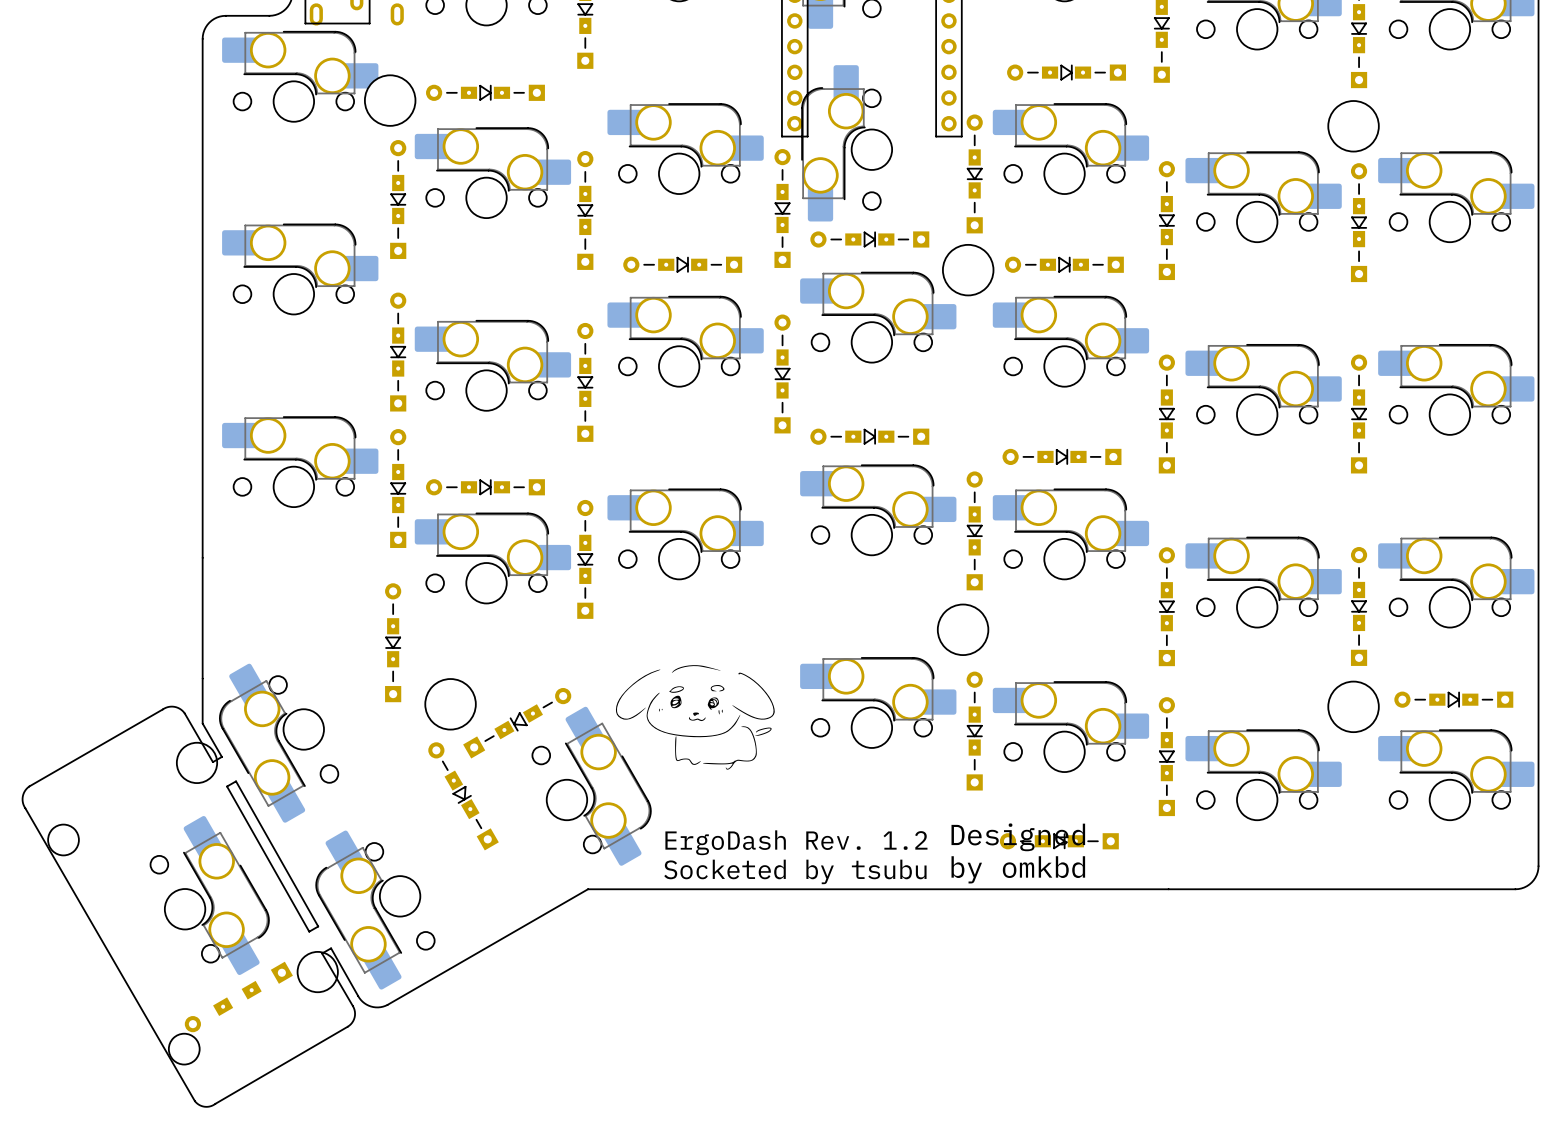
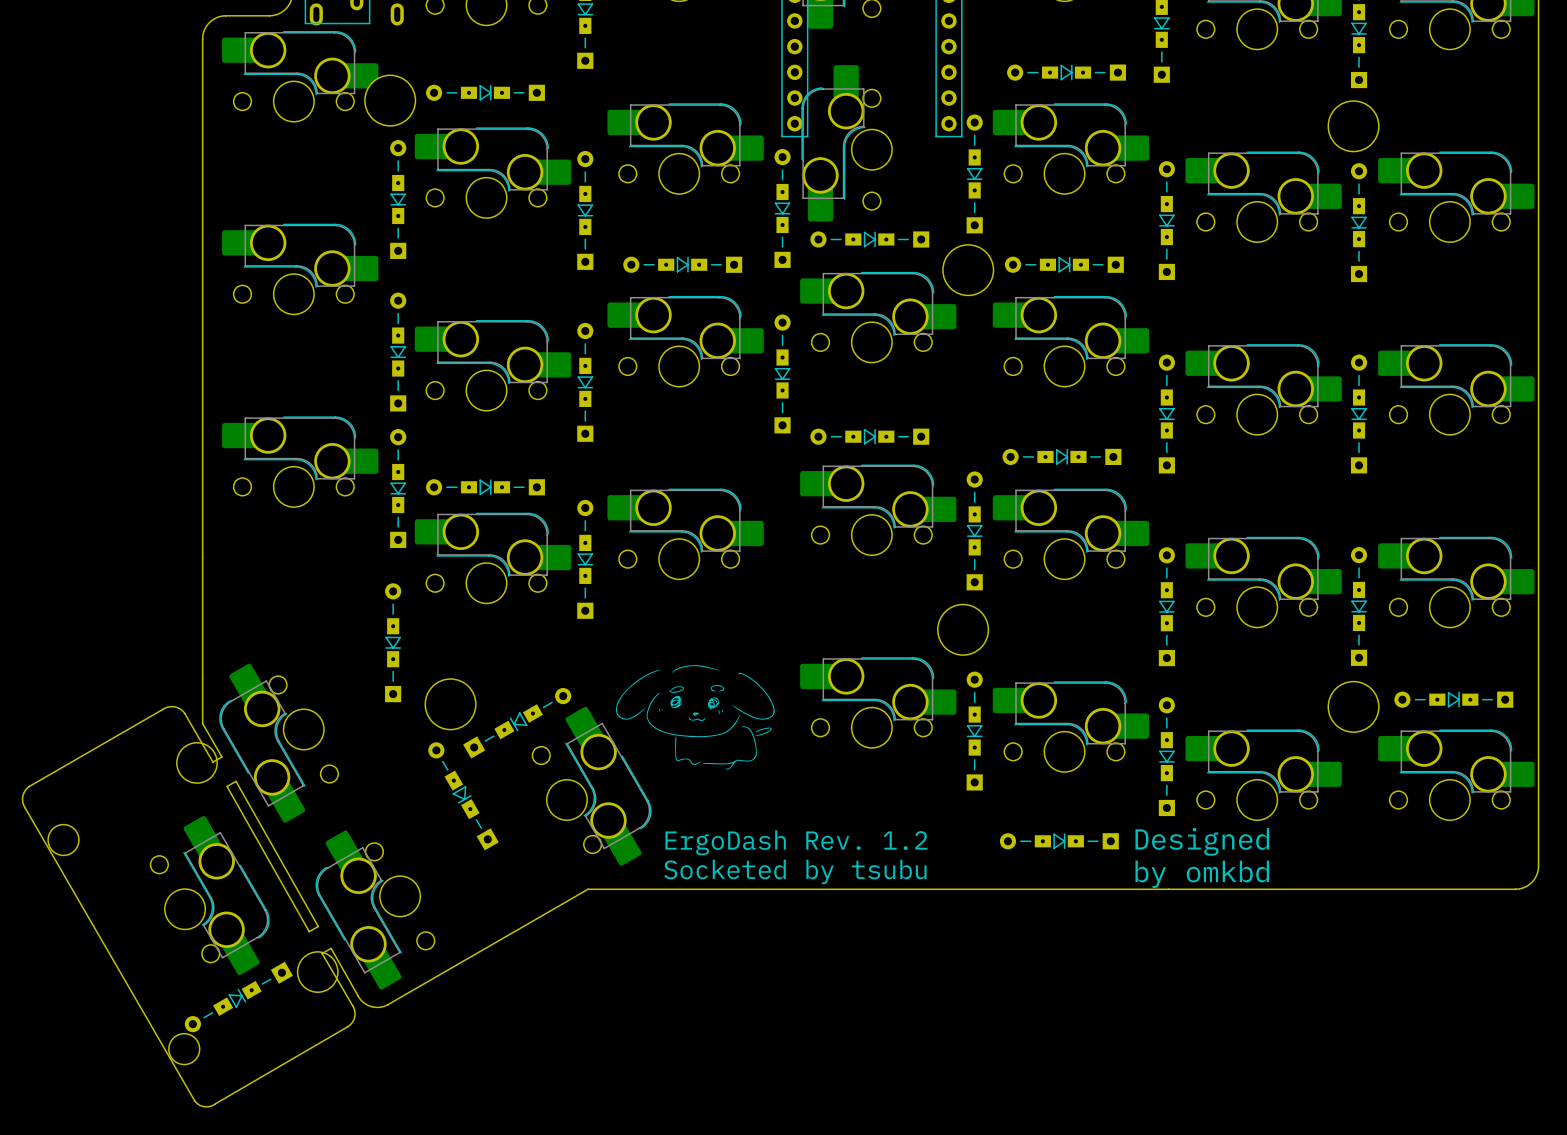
text position: Designed (1018, 837) -> Designed (1202, 841)
text position: by omkbd (1018, 869) -> by omkbd (1202, 874)
part footprint: [184, 961, 293, 1033] -> [184, 961, 293, 1033]

